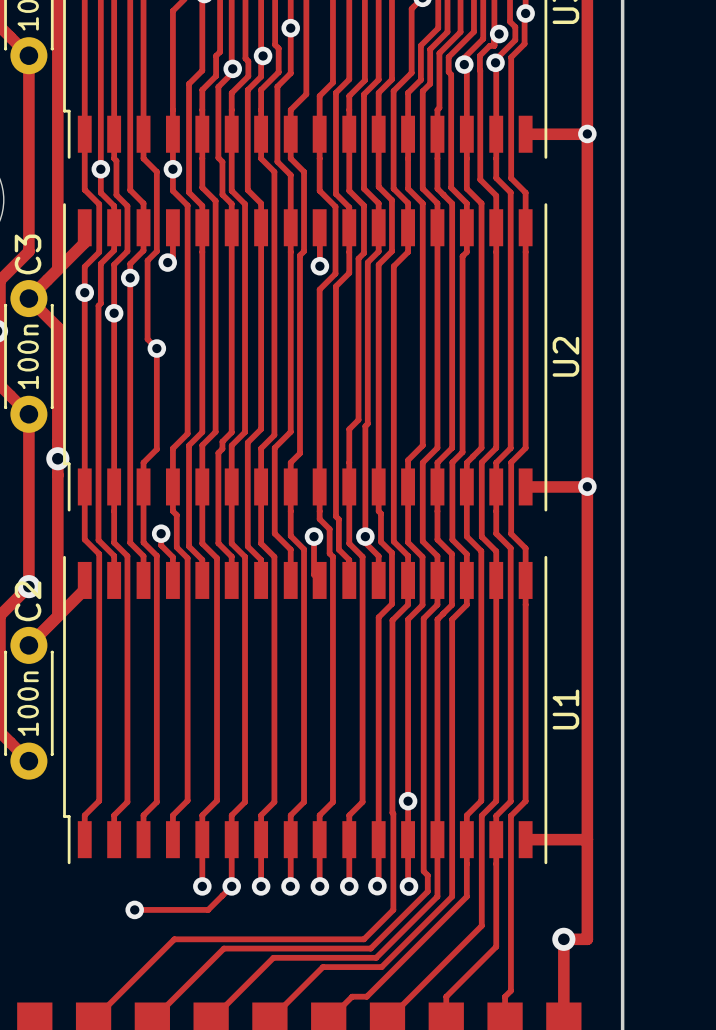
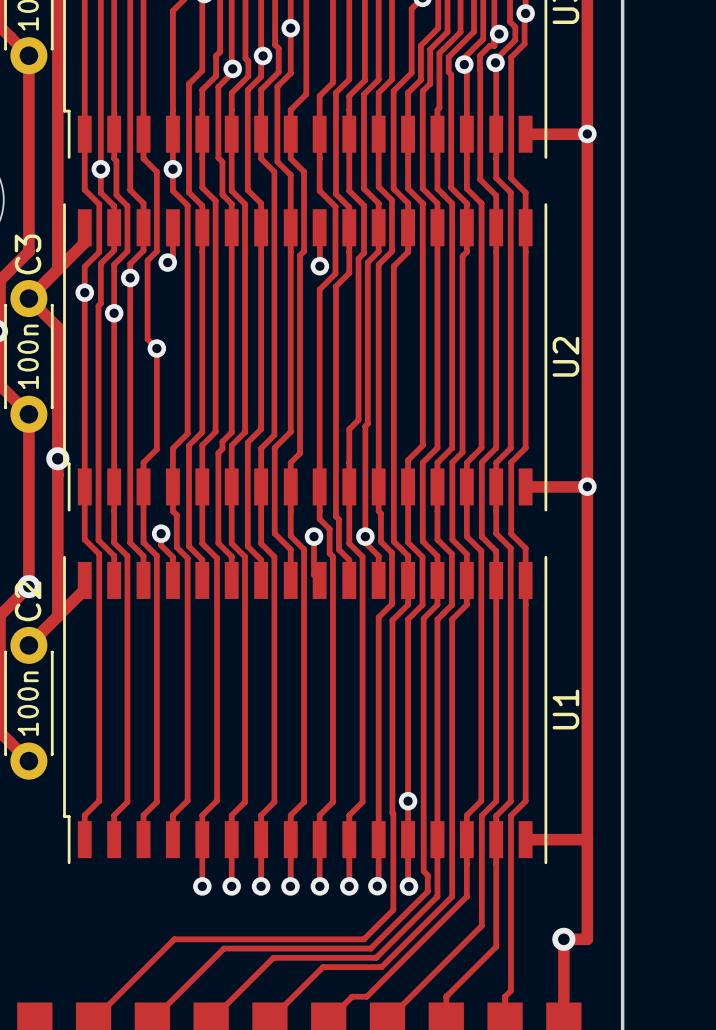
track: (231, 886) (208, 909) (134, 909) -> none
via: (134, 909) -> none

